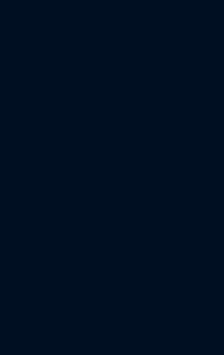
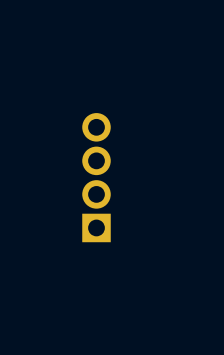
part: none -> (96, 177)

